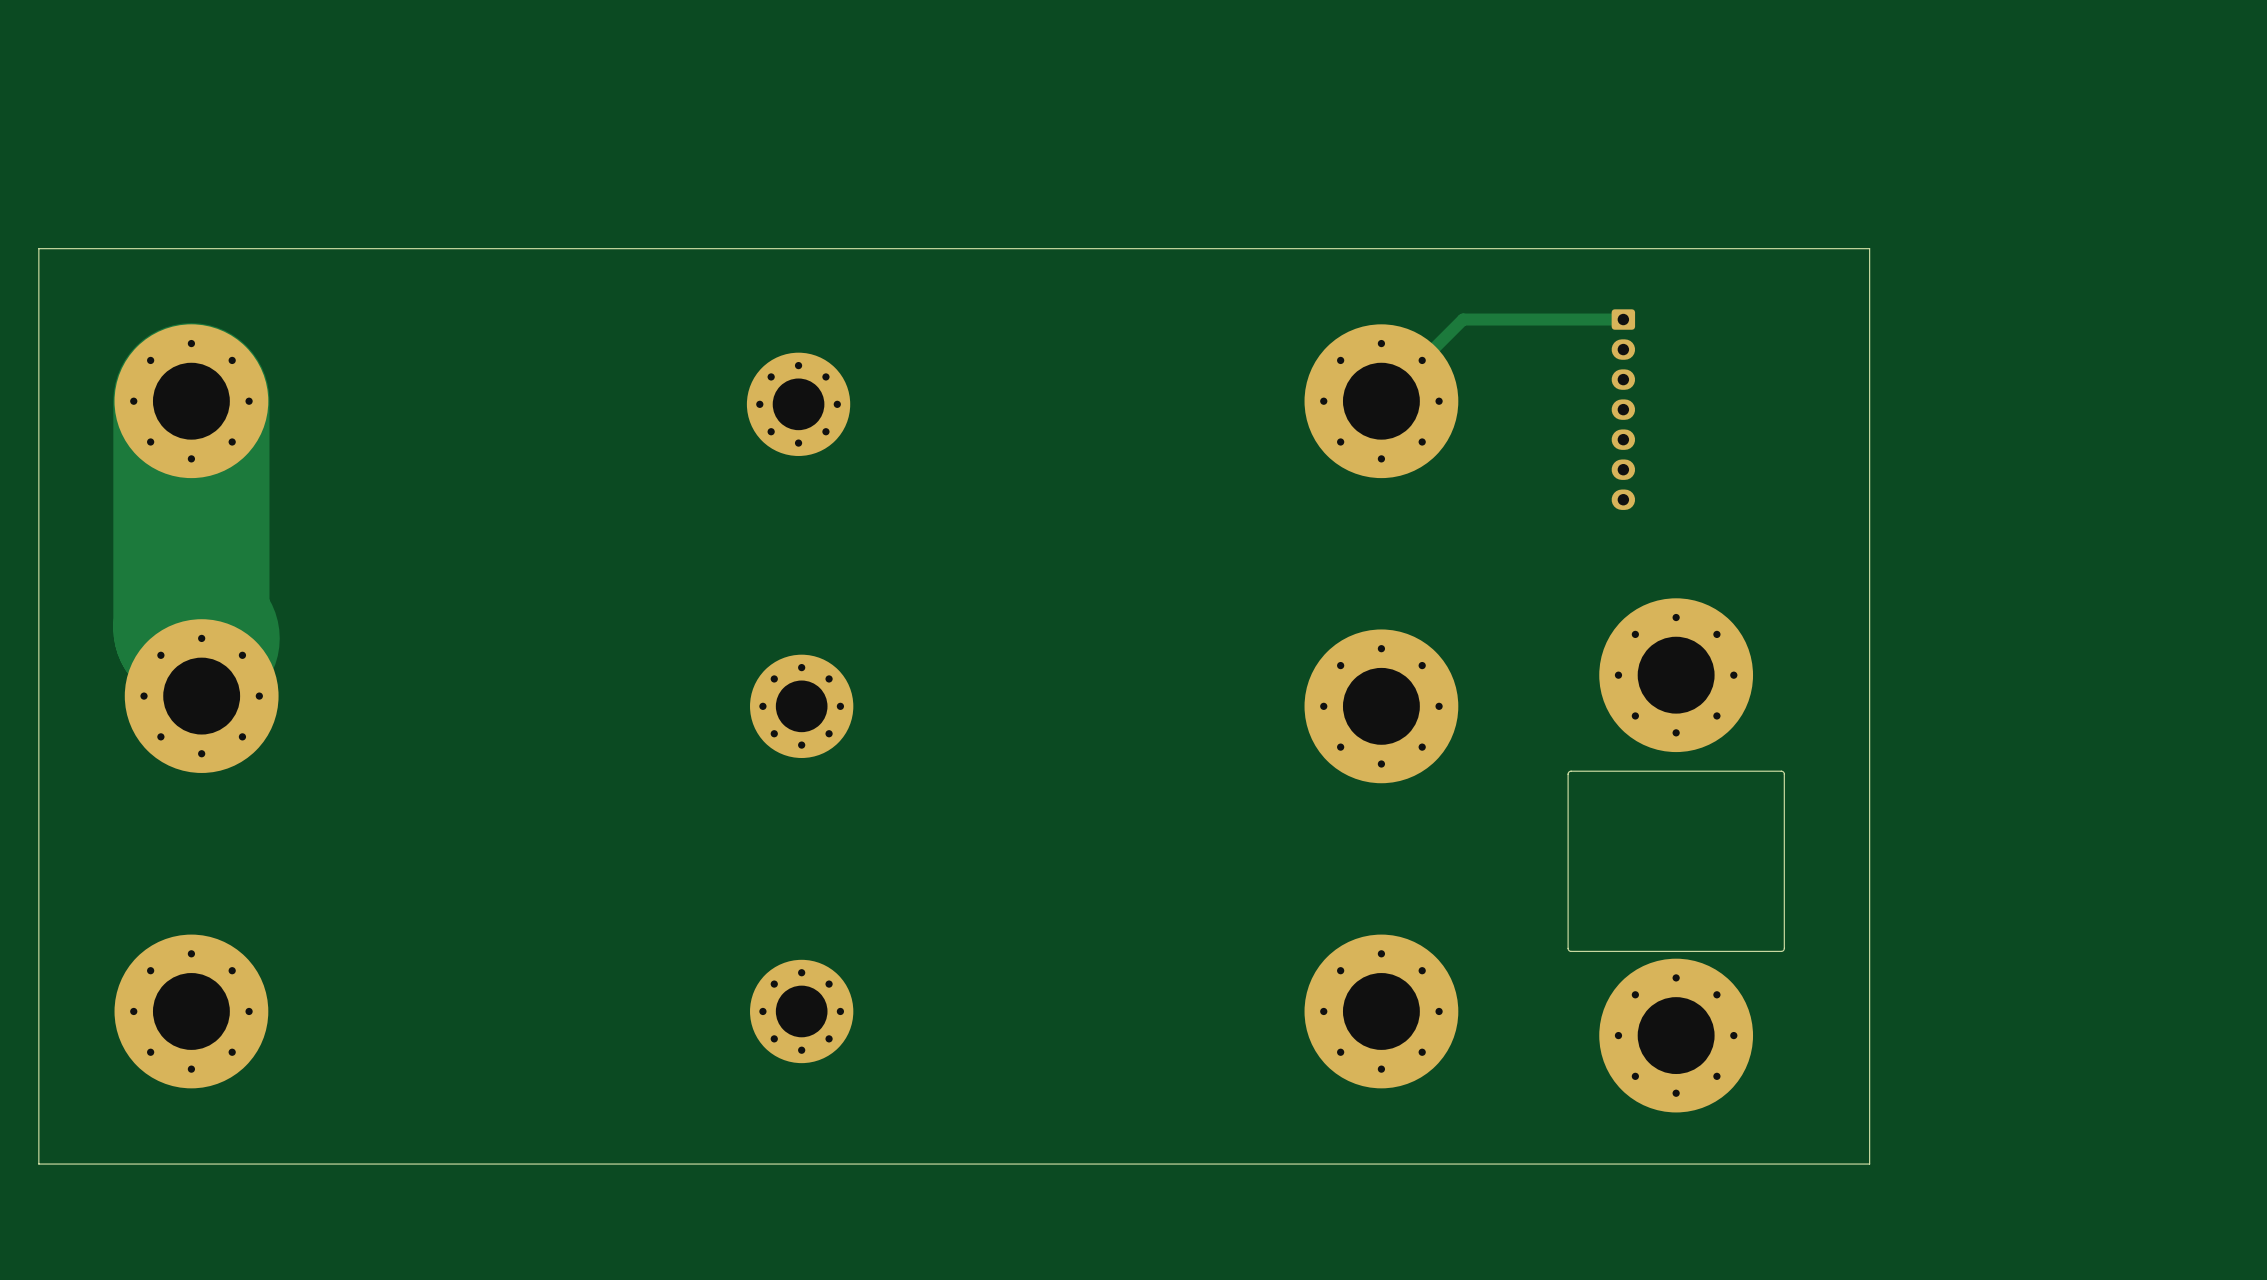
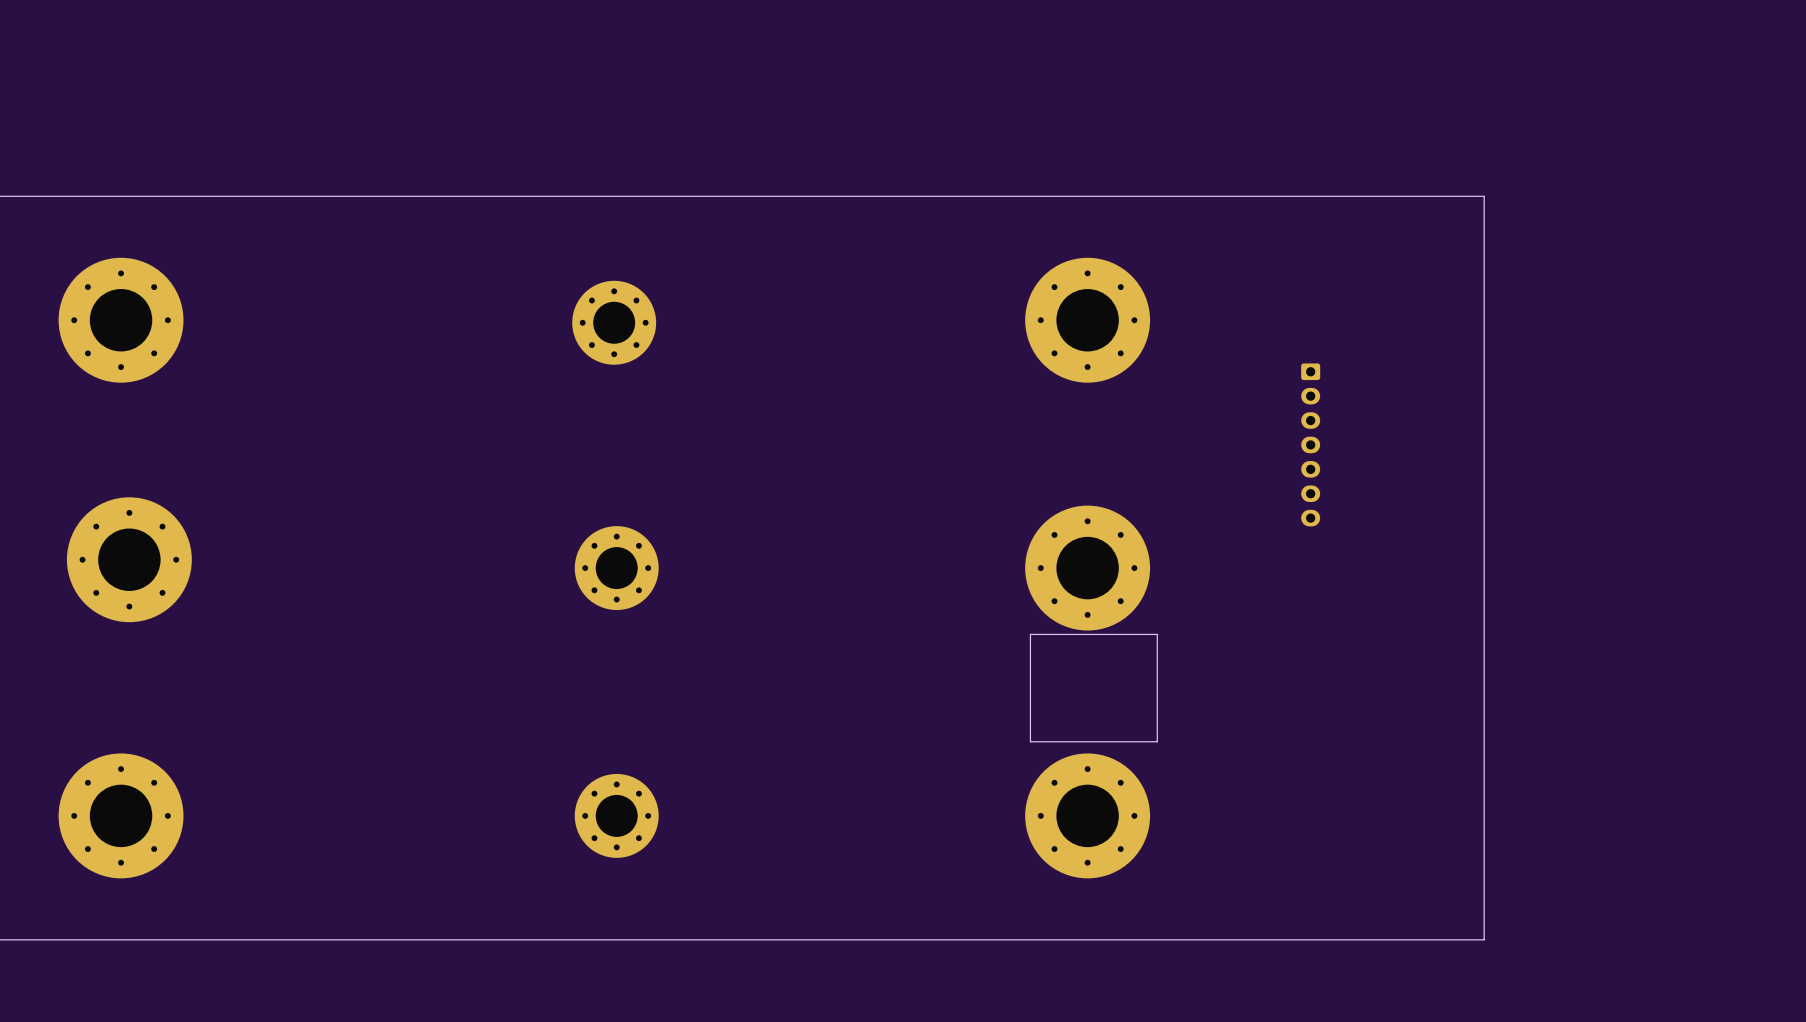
track: (1623, 319) (1463, 319) (1381, 401) -> none
track: (191, 401) (191, 628) (201, 638) -> none
part position: (1623, 409) -> (1310, 444)
part: (1676, 675) -> none
board edge: (1781, 771) (1569, 771) (1568, 950) (1783, 950) (1784, 774) (1781, 771) -> none
board edge: none -> (1157, 634) (1157, 741) (1030, 741) (1030, 634) (1157, 634)
part: (1676, 1035) -> none

